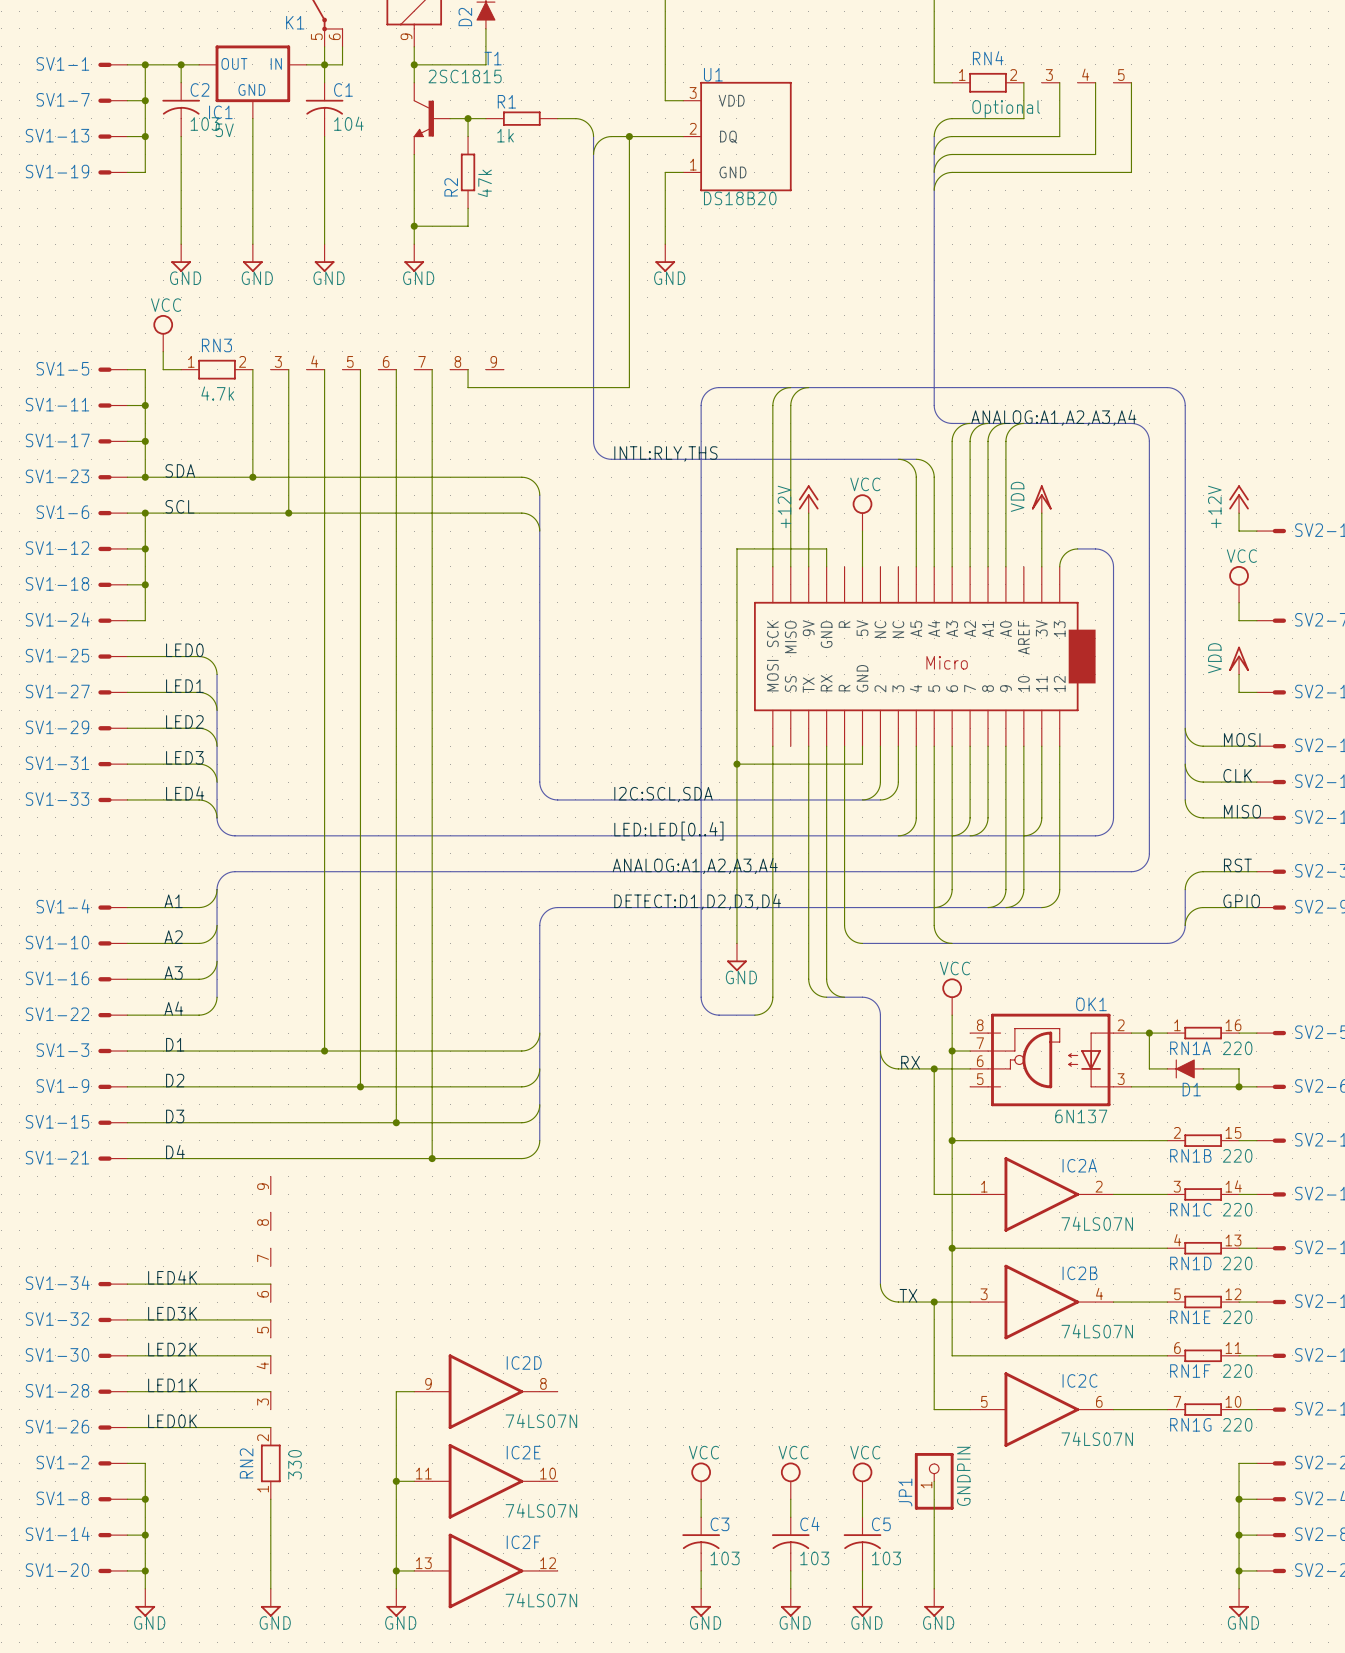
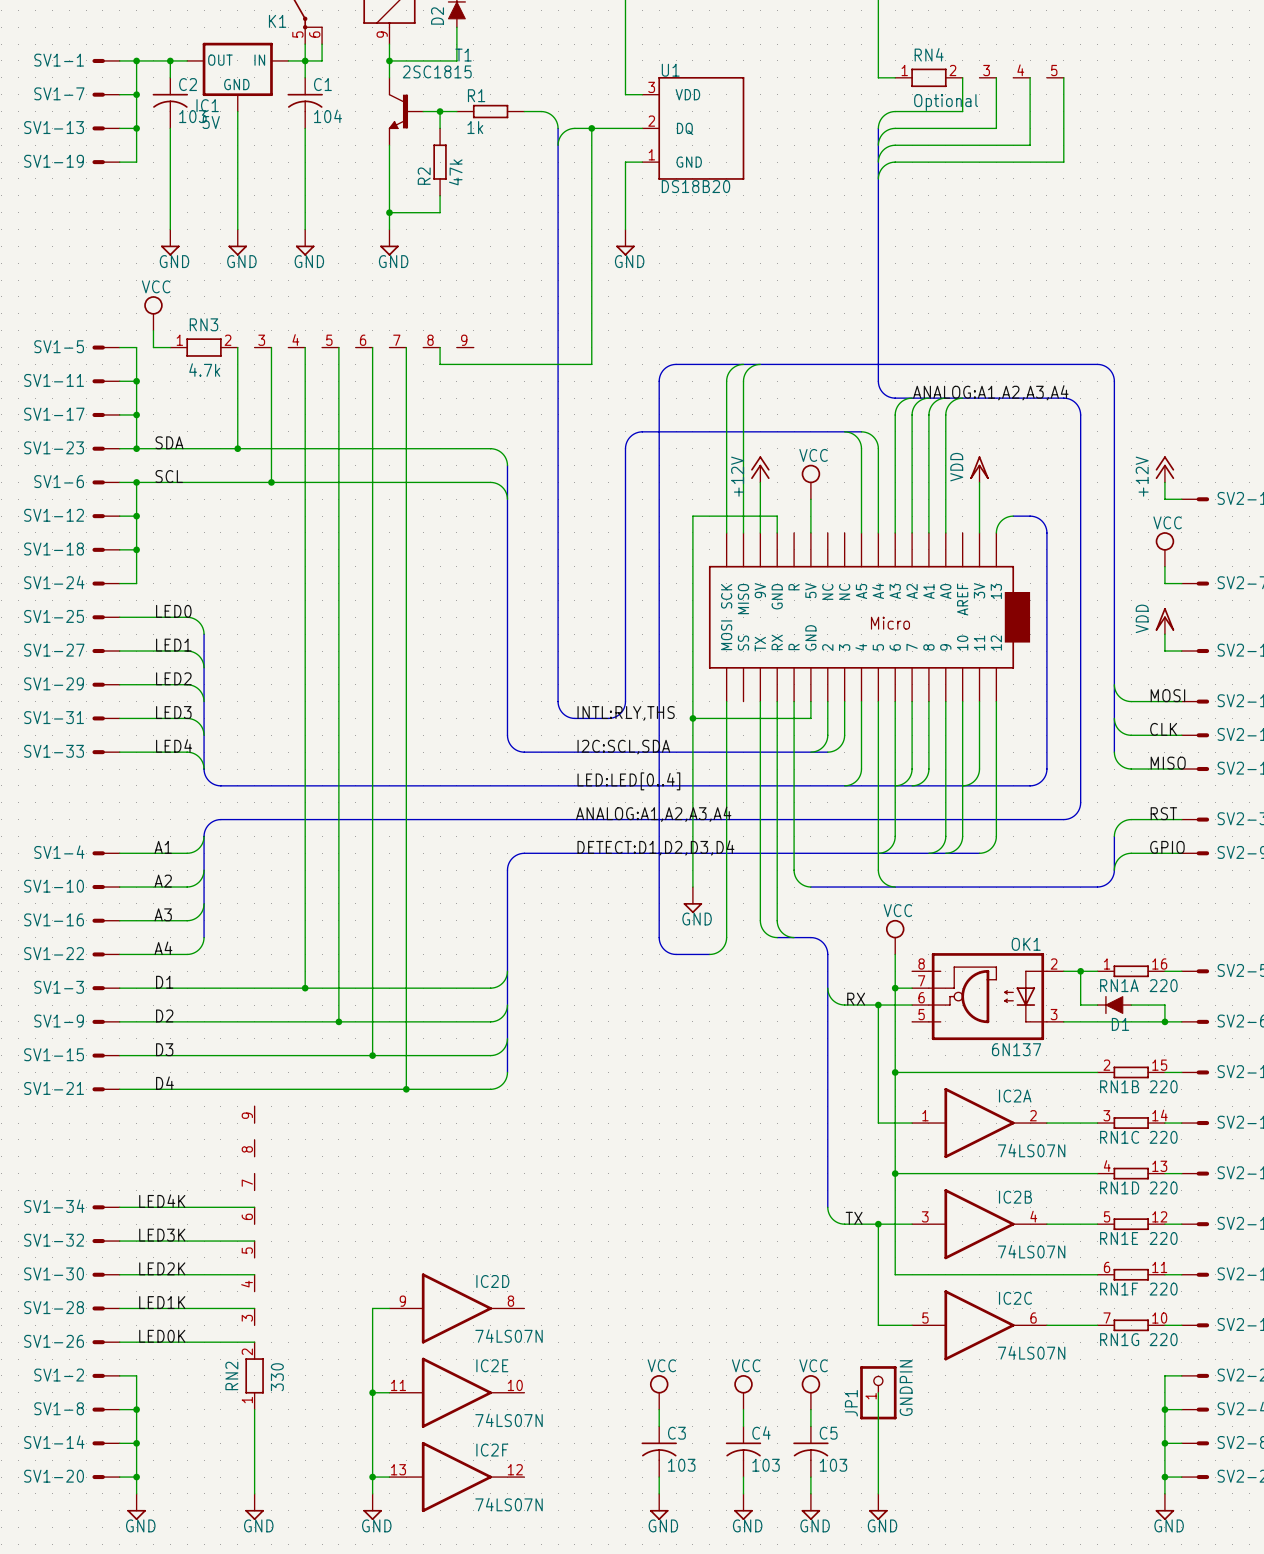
bus: (593, 441) (597, 452) (606, 458) (683, 459) -> (558, 414) (558, 701) (561, 711) (570, 717) (612, 717) (620, 713) (624, 705) (625, 448) (630, 436) (642, 431)
label: INTL:RLY,THS (665, 453) -> none
label: none -> INTL:RLY,THS (626, 713)

